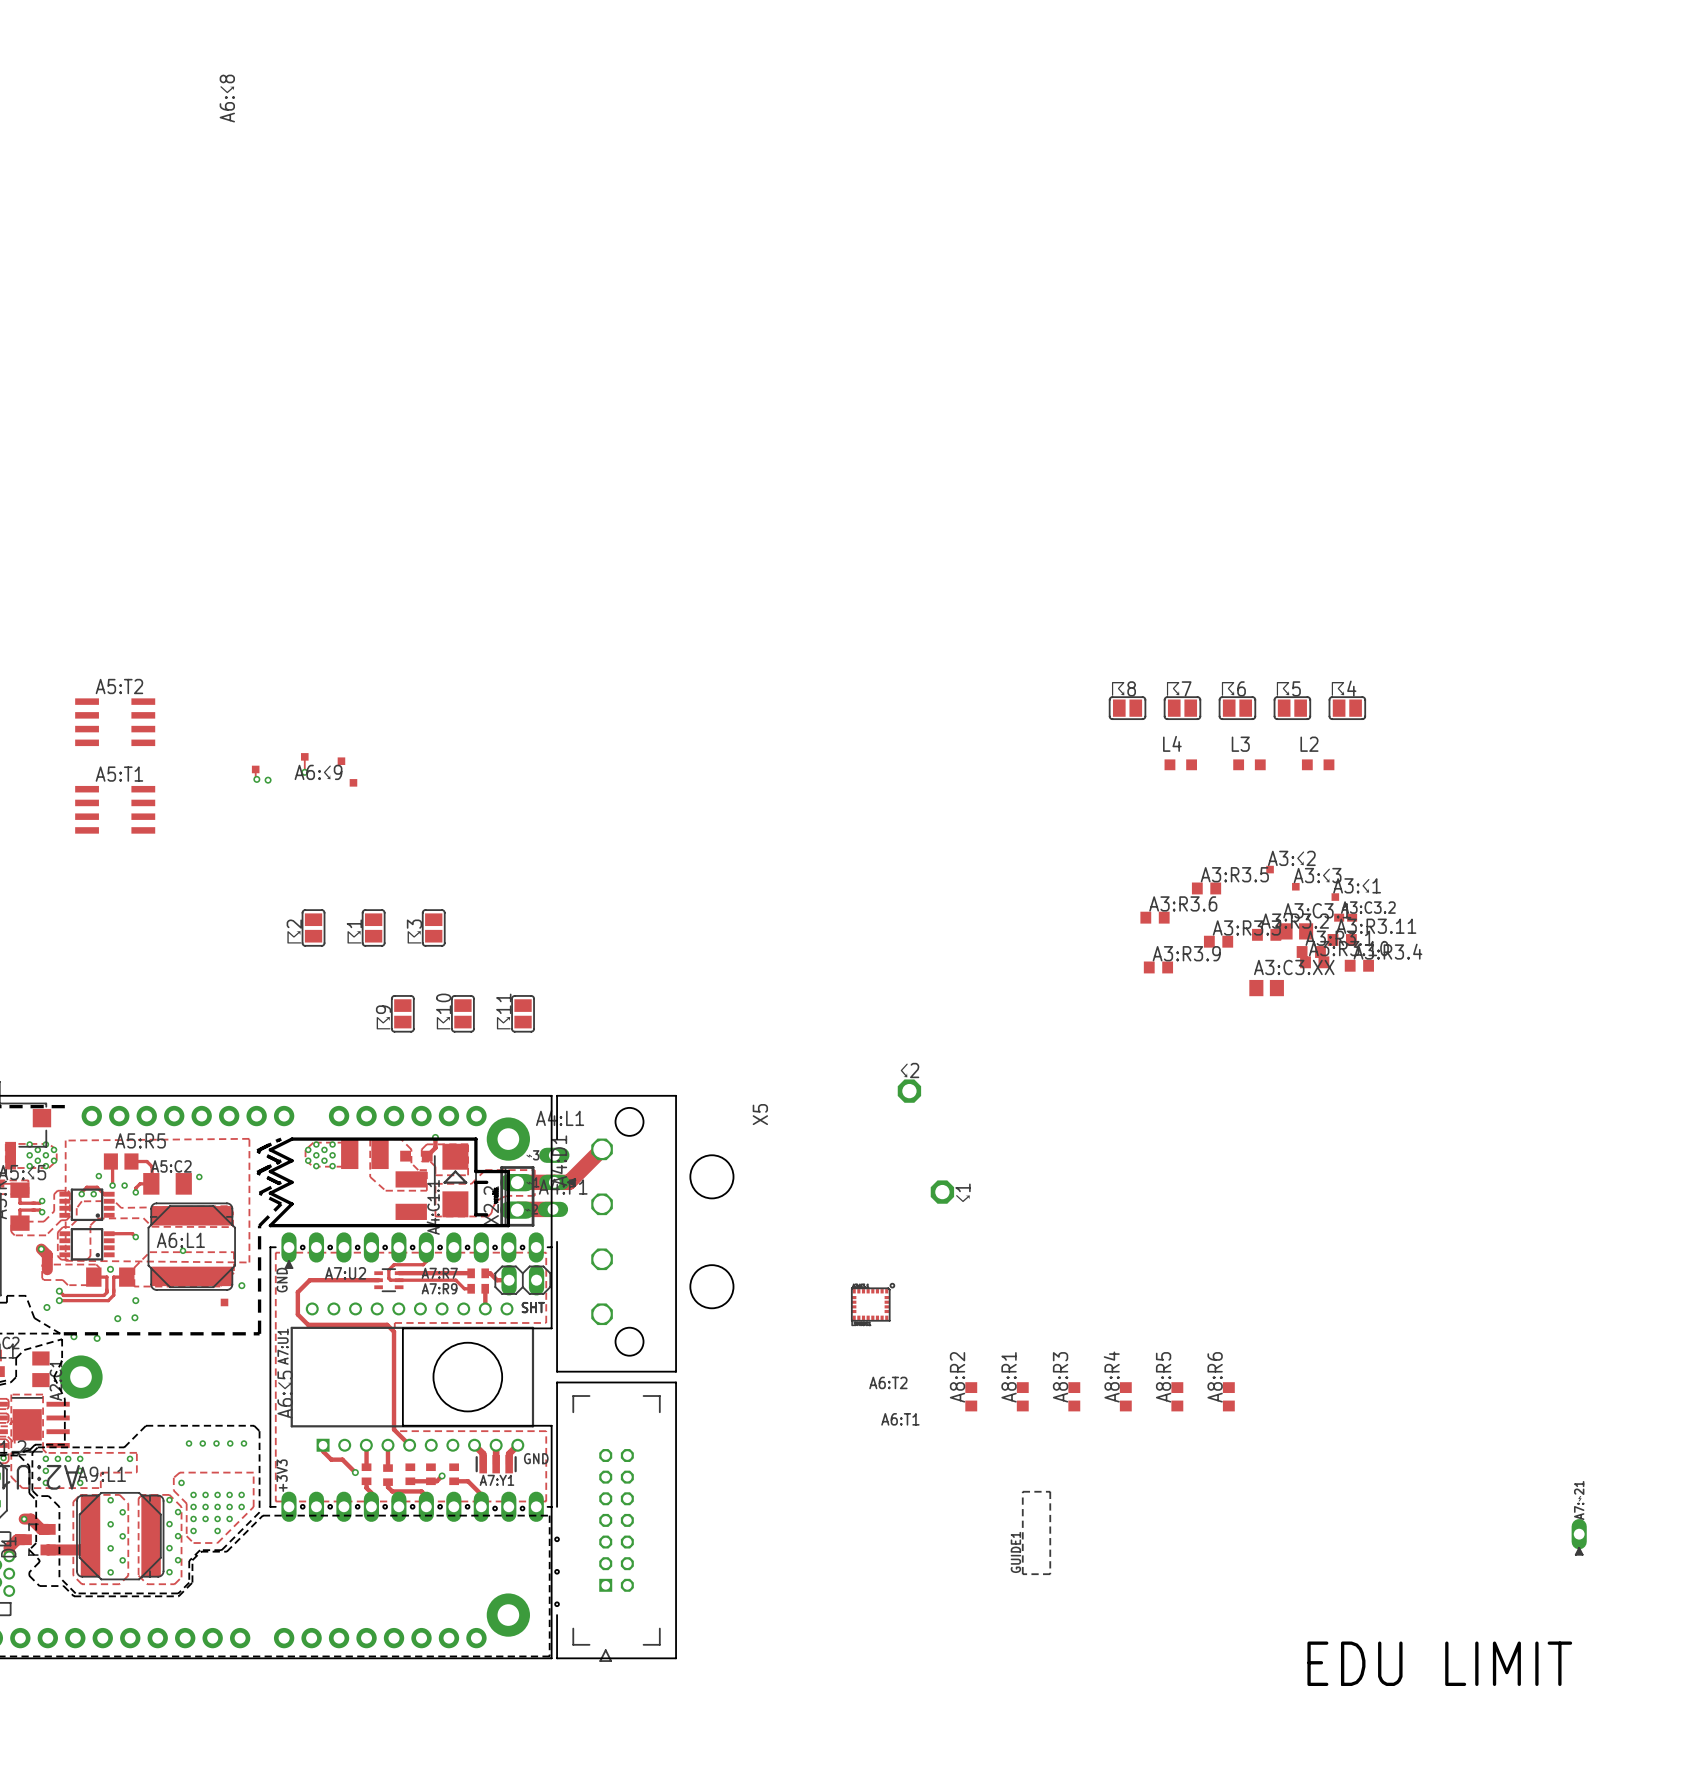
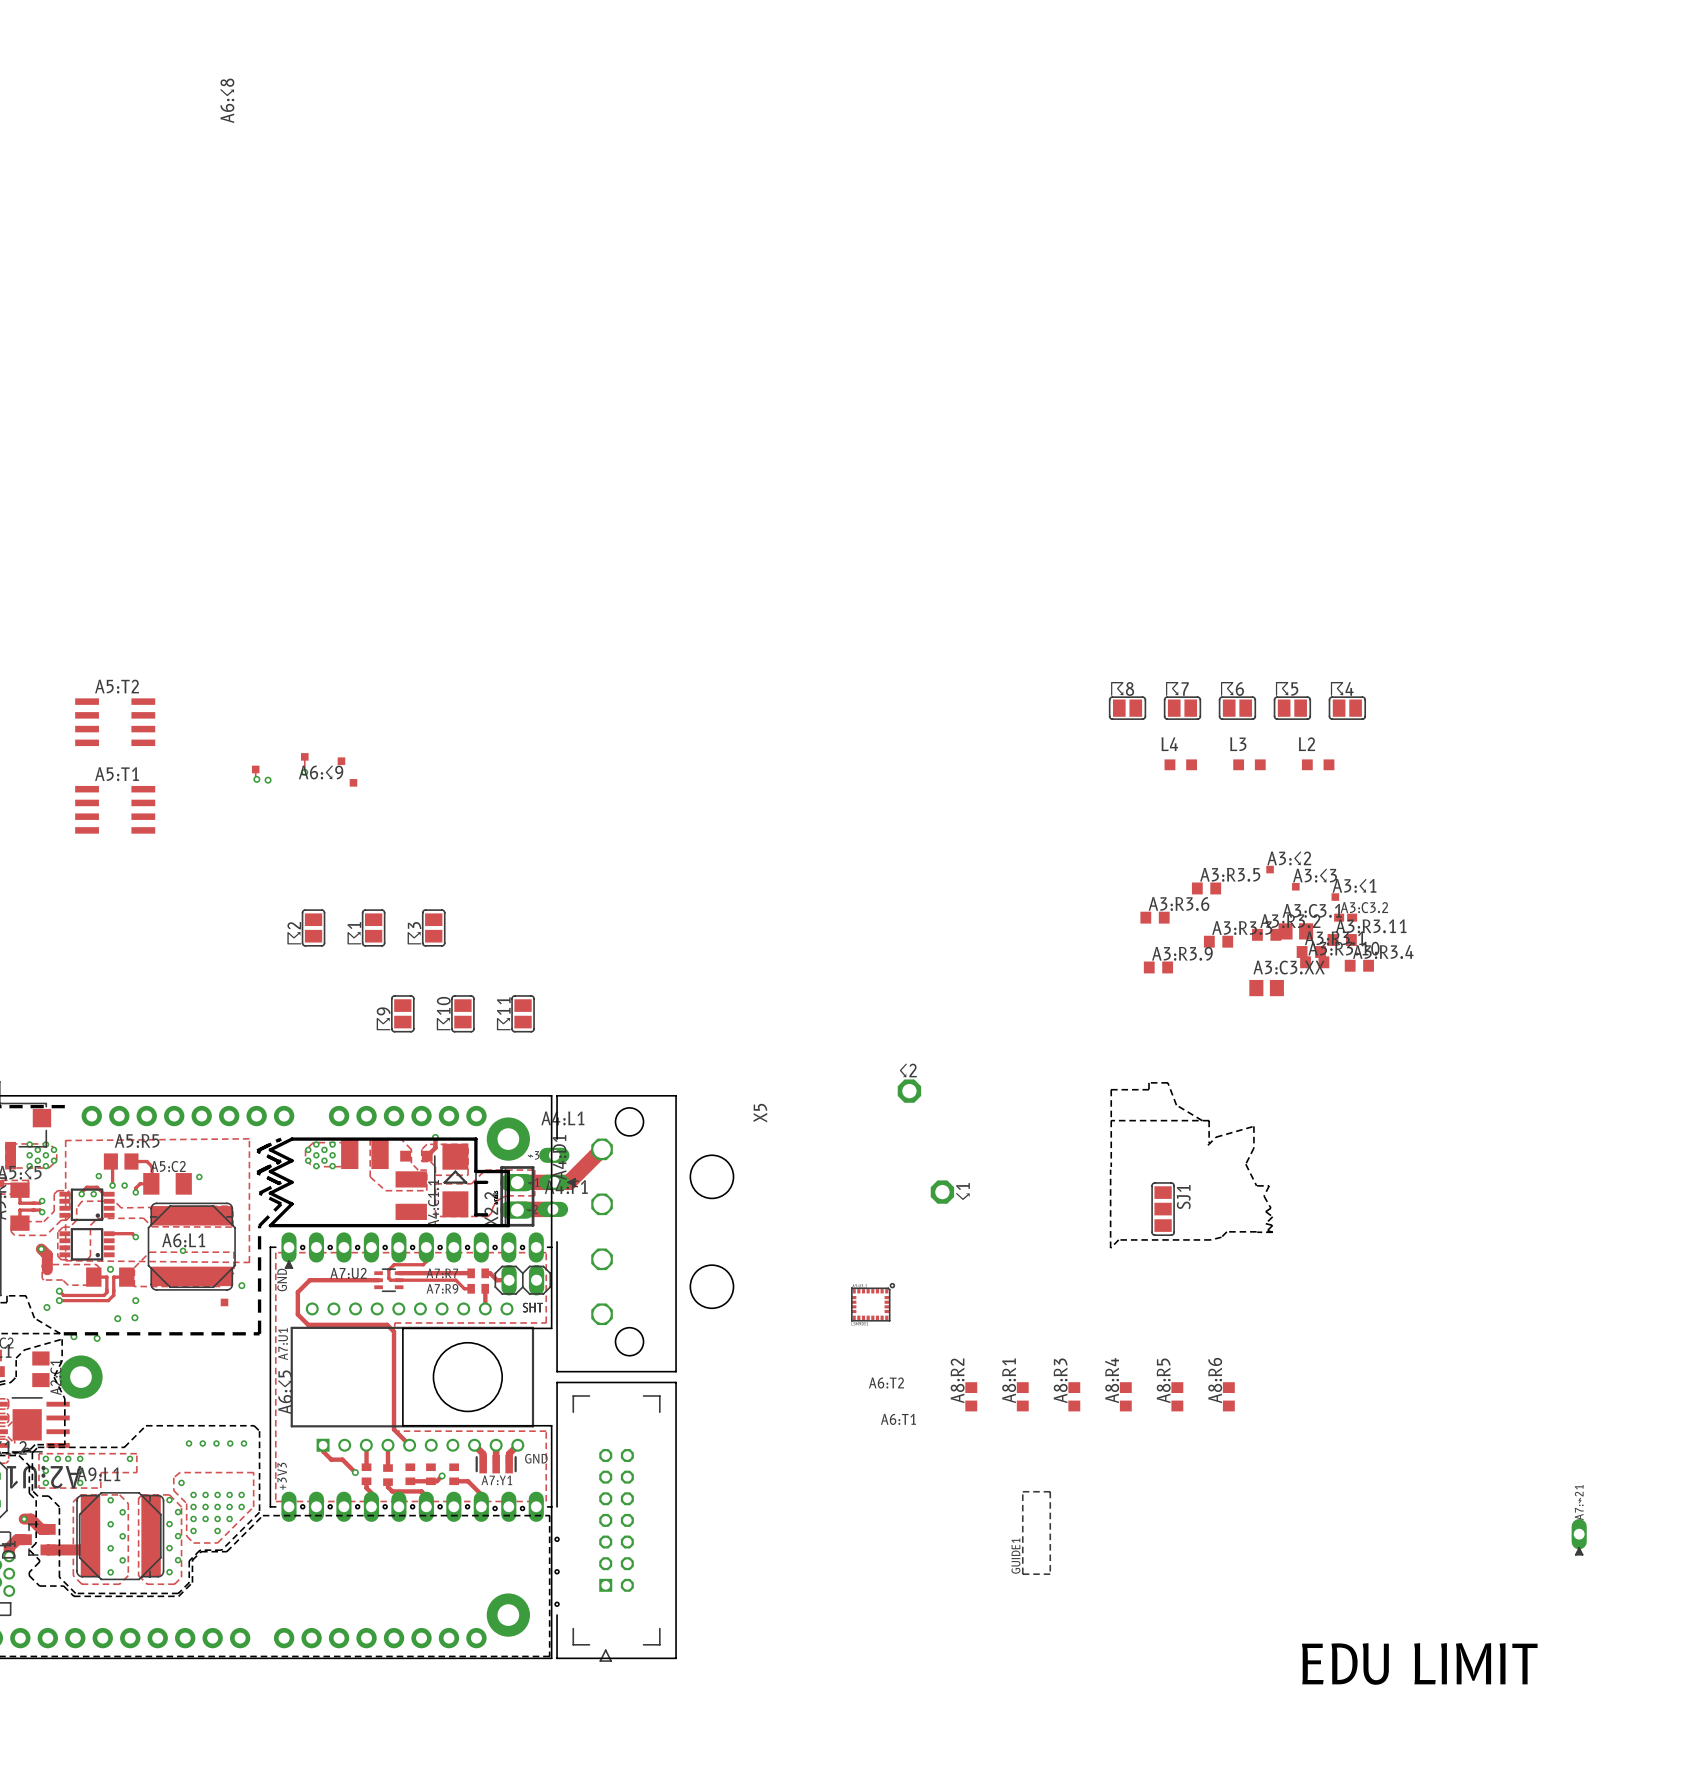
board edge: none -> (1111, 1120) (1209, 1120) (1209, 1142)
board edge: none -> (1202, 1120) (1176, 1105) (1167, 1082) (1149, 1082) (1149, 1089) (1111, 1089) (1111, 1167)
board edge: none -> (1207, 1145) (1216, 1137) (1253, 1126) (1253, 1148) (1245, 1164) (1256, 1185)
board edge: none -> (1110, 1169) (1110, 1248) (1118, 1239) (1210, 1239) (1221, 1237) (1226, 1231) (1256, 1231)
board edge: none -> (1257, 1185) (1269, 1185) (1264, 1196) (1270, 1208) (1265, 1211) (1272, 1216) (1265, 1223) (1272, 1225) (1267, 1230) (1272, 1232) (1257, 1232)
SJ1: none -> (1163, 1209)
zone outline: (136, 1453) (46, 1452) (43, 1449) (43, 1394) (11, 1394) (11, 1476) (22, 1488) (100, 1488) -> (136, 1453) (38, 1453) (38, 1488) (100, 1488)
via: (3, 1458) -> none

